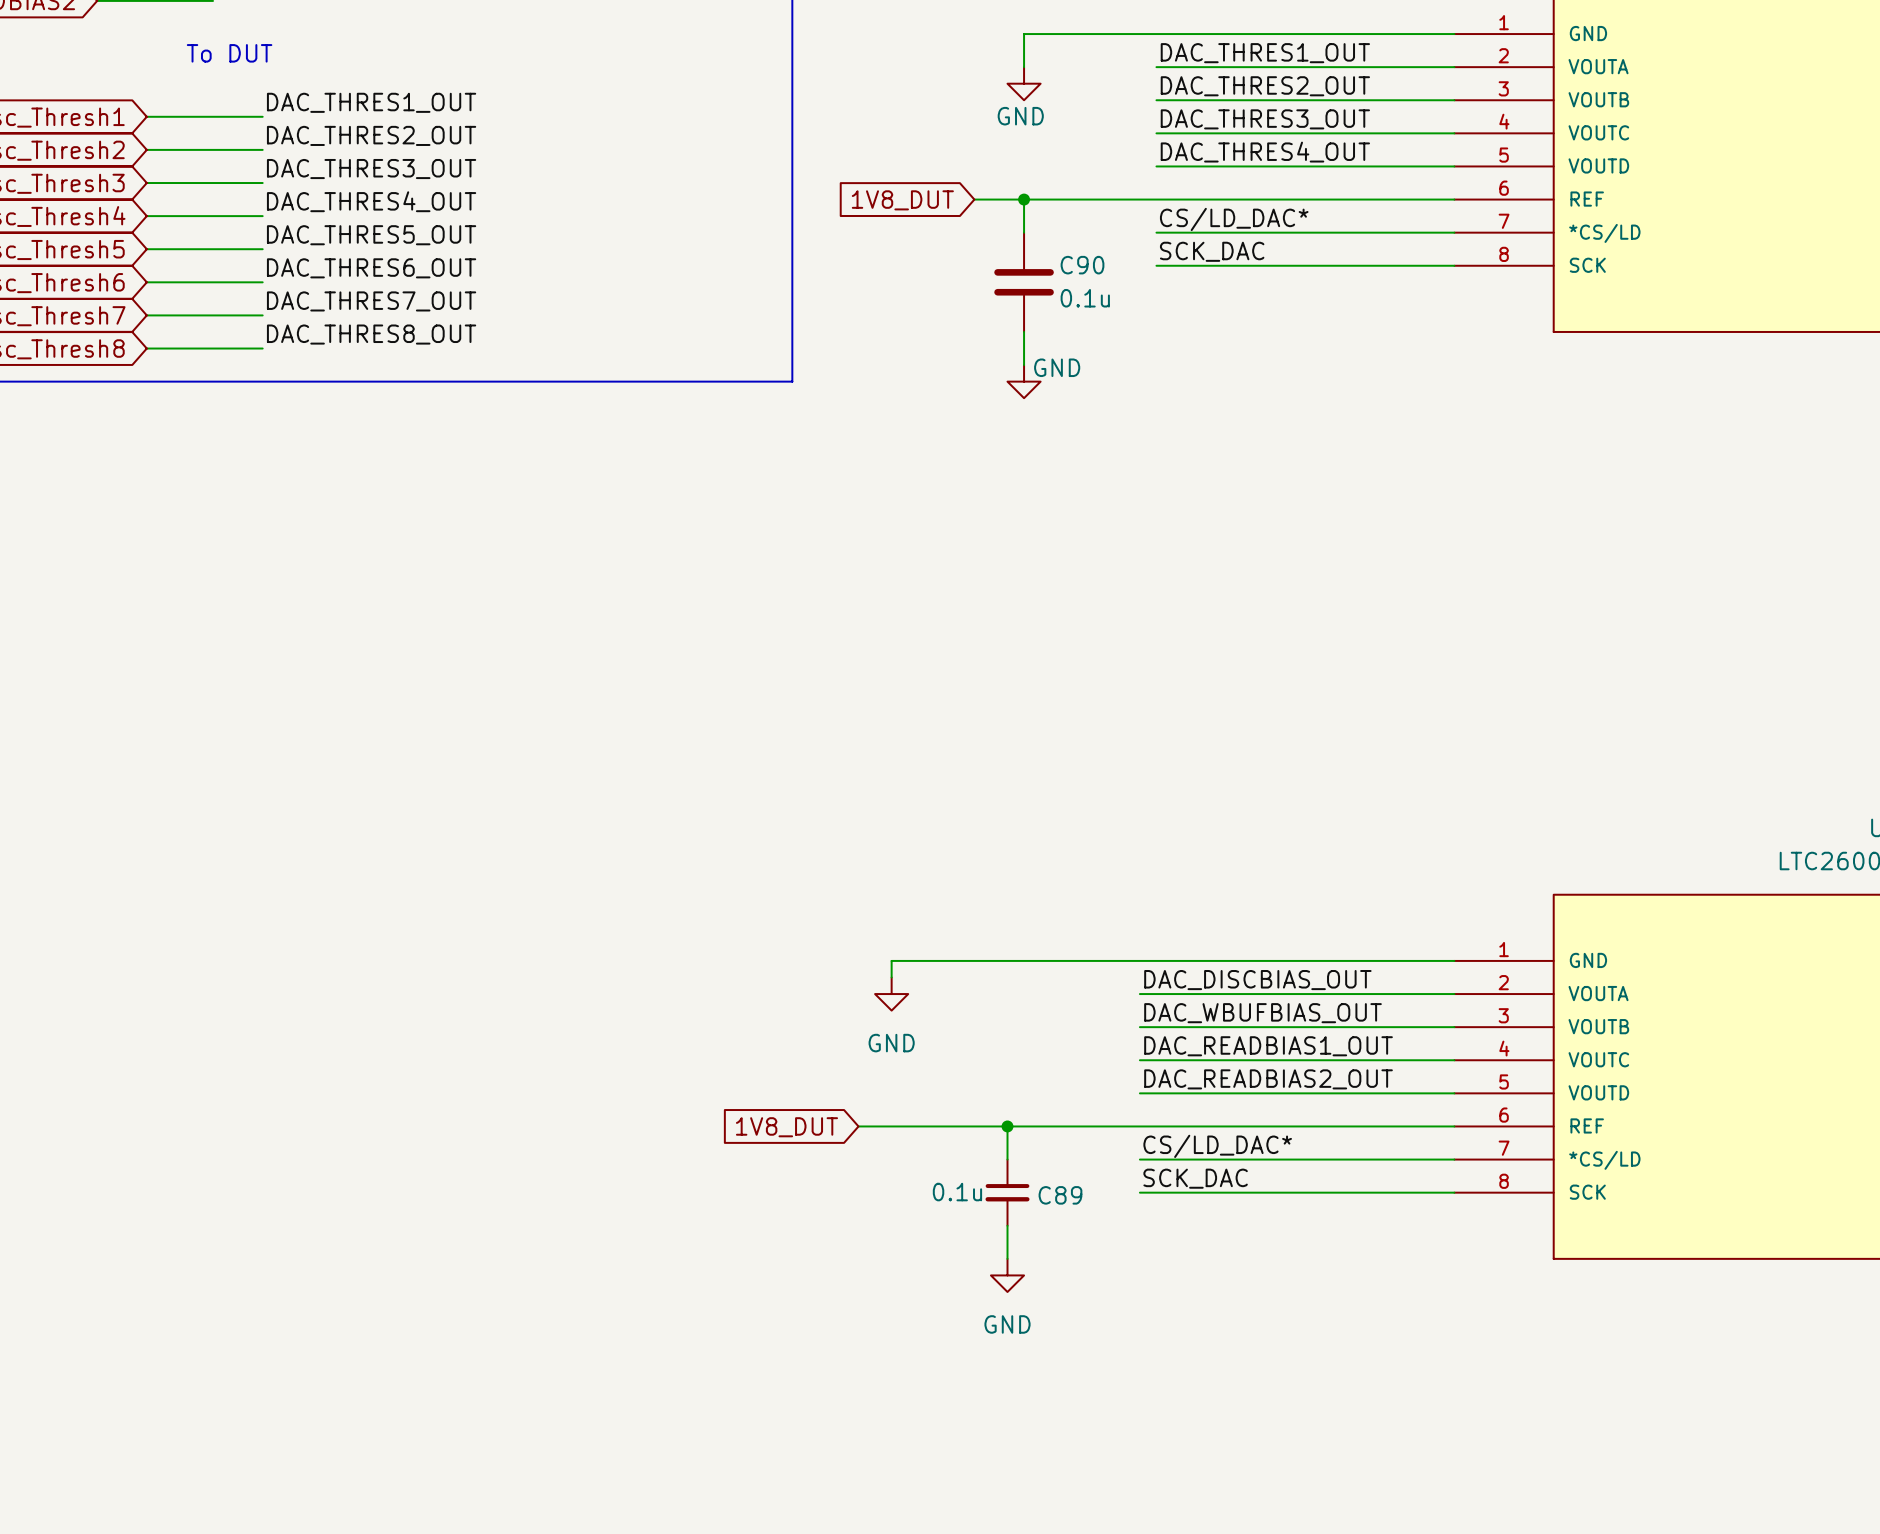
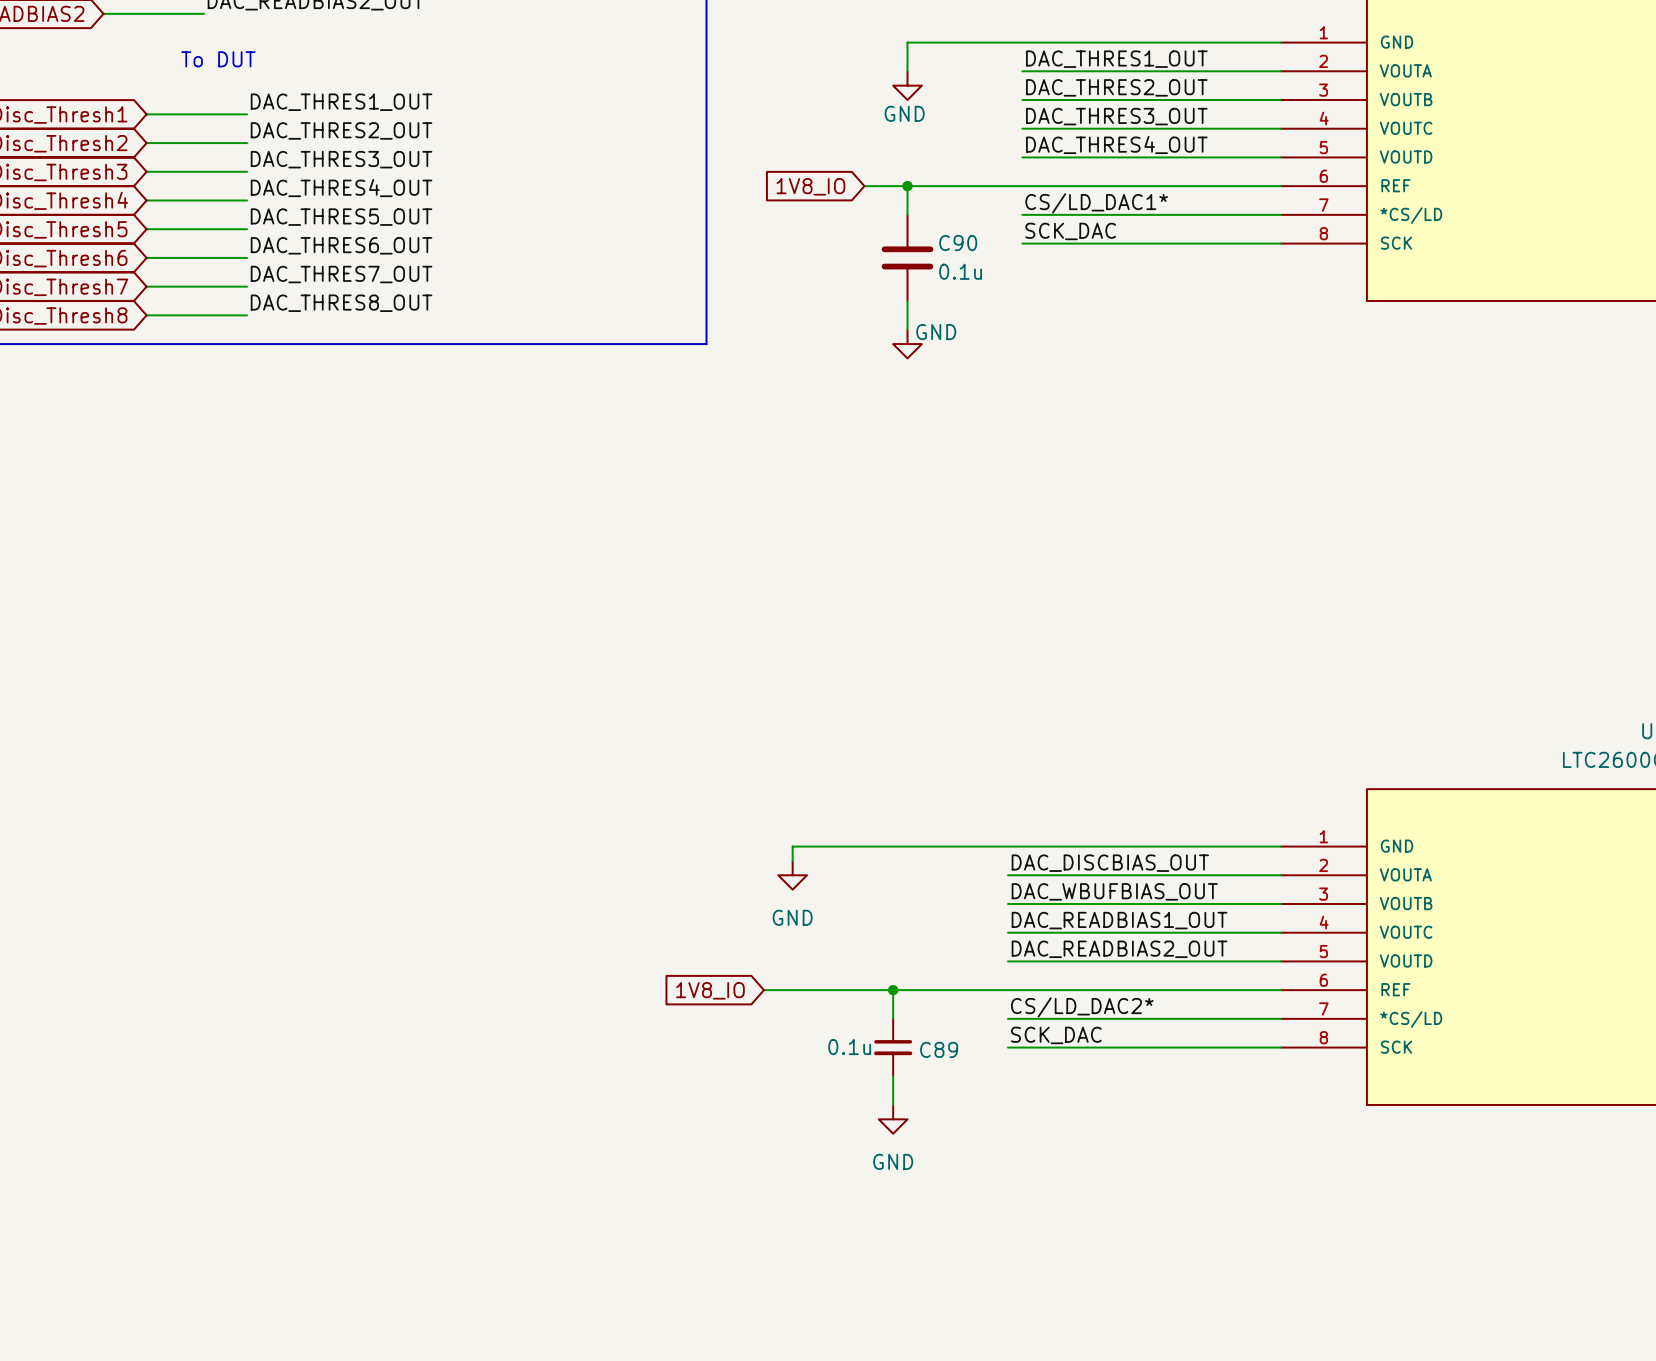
global label: 1V8_DUT (902, 200) -> 1V8_IO (810, 186)
label: CS/LD_DAC* (1234, 219) -> CS/LD_DAC1* (1096, 203)
global label: 1V8_DUT (786, 1127) -> 1V8_IO (710, 990)
label: CS/LD_DAC* (1217, 1146) -> CS/LD_DAC2* (1082, 1007)

